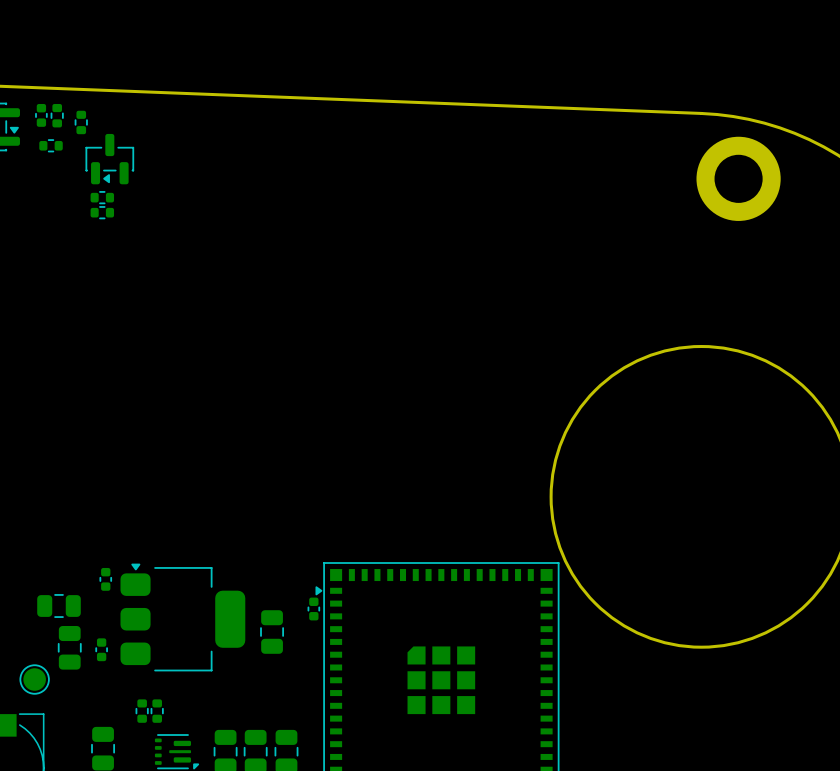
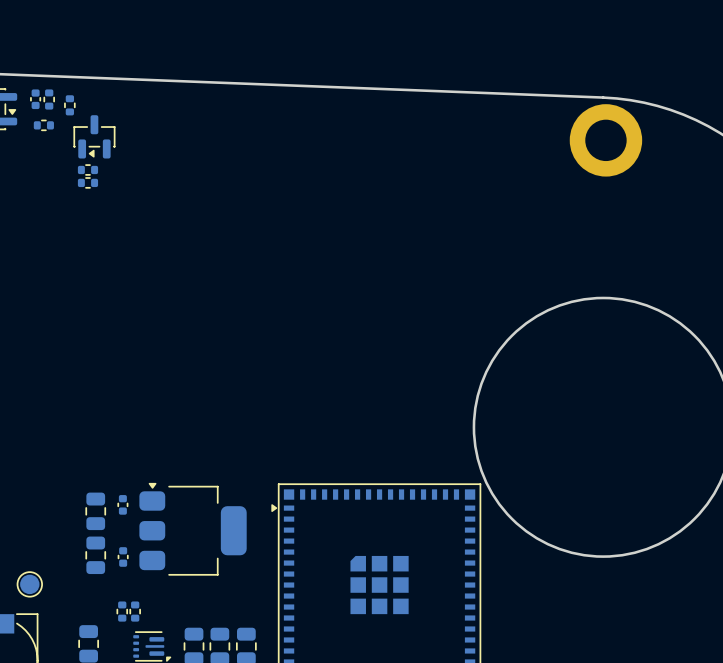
part position: (738, 178) -> (605, 140)
part position: (105, 579) -> (122, 504)
part: none -> (95, 511)
part: (59, 606) -> none
part: (313, 609) -> none
part position: (182, 617) -> (193, 529)
part: (272, 632) -> none
part footprint: [95, 638, 108, 662] -> [85, 536, 107, 575]
part: (69, 647) -> none
part: none -> (123, 556)

